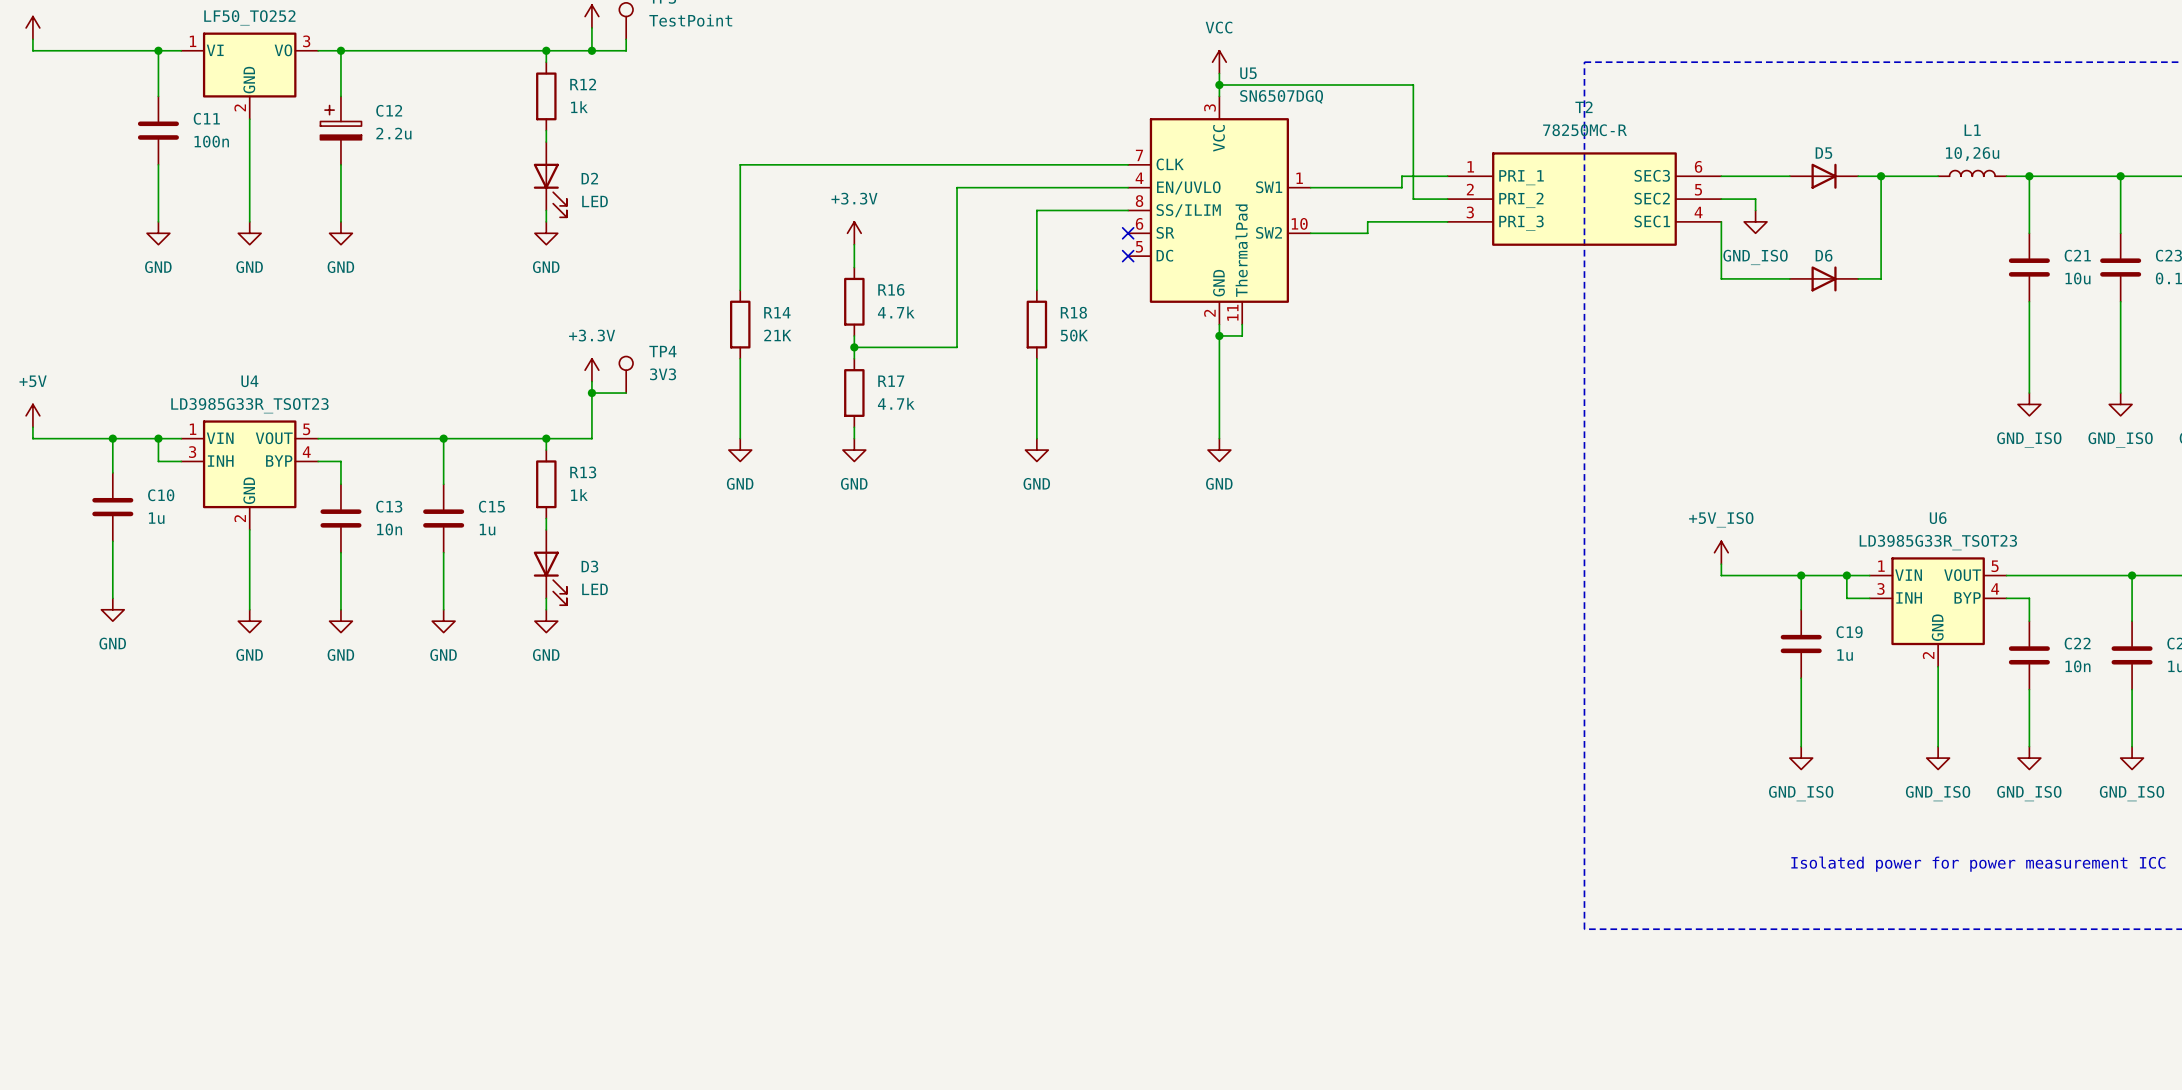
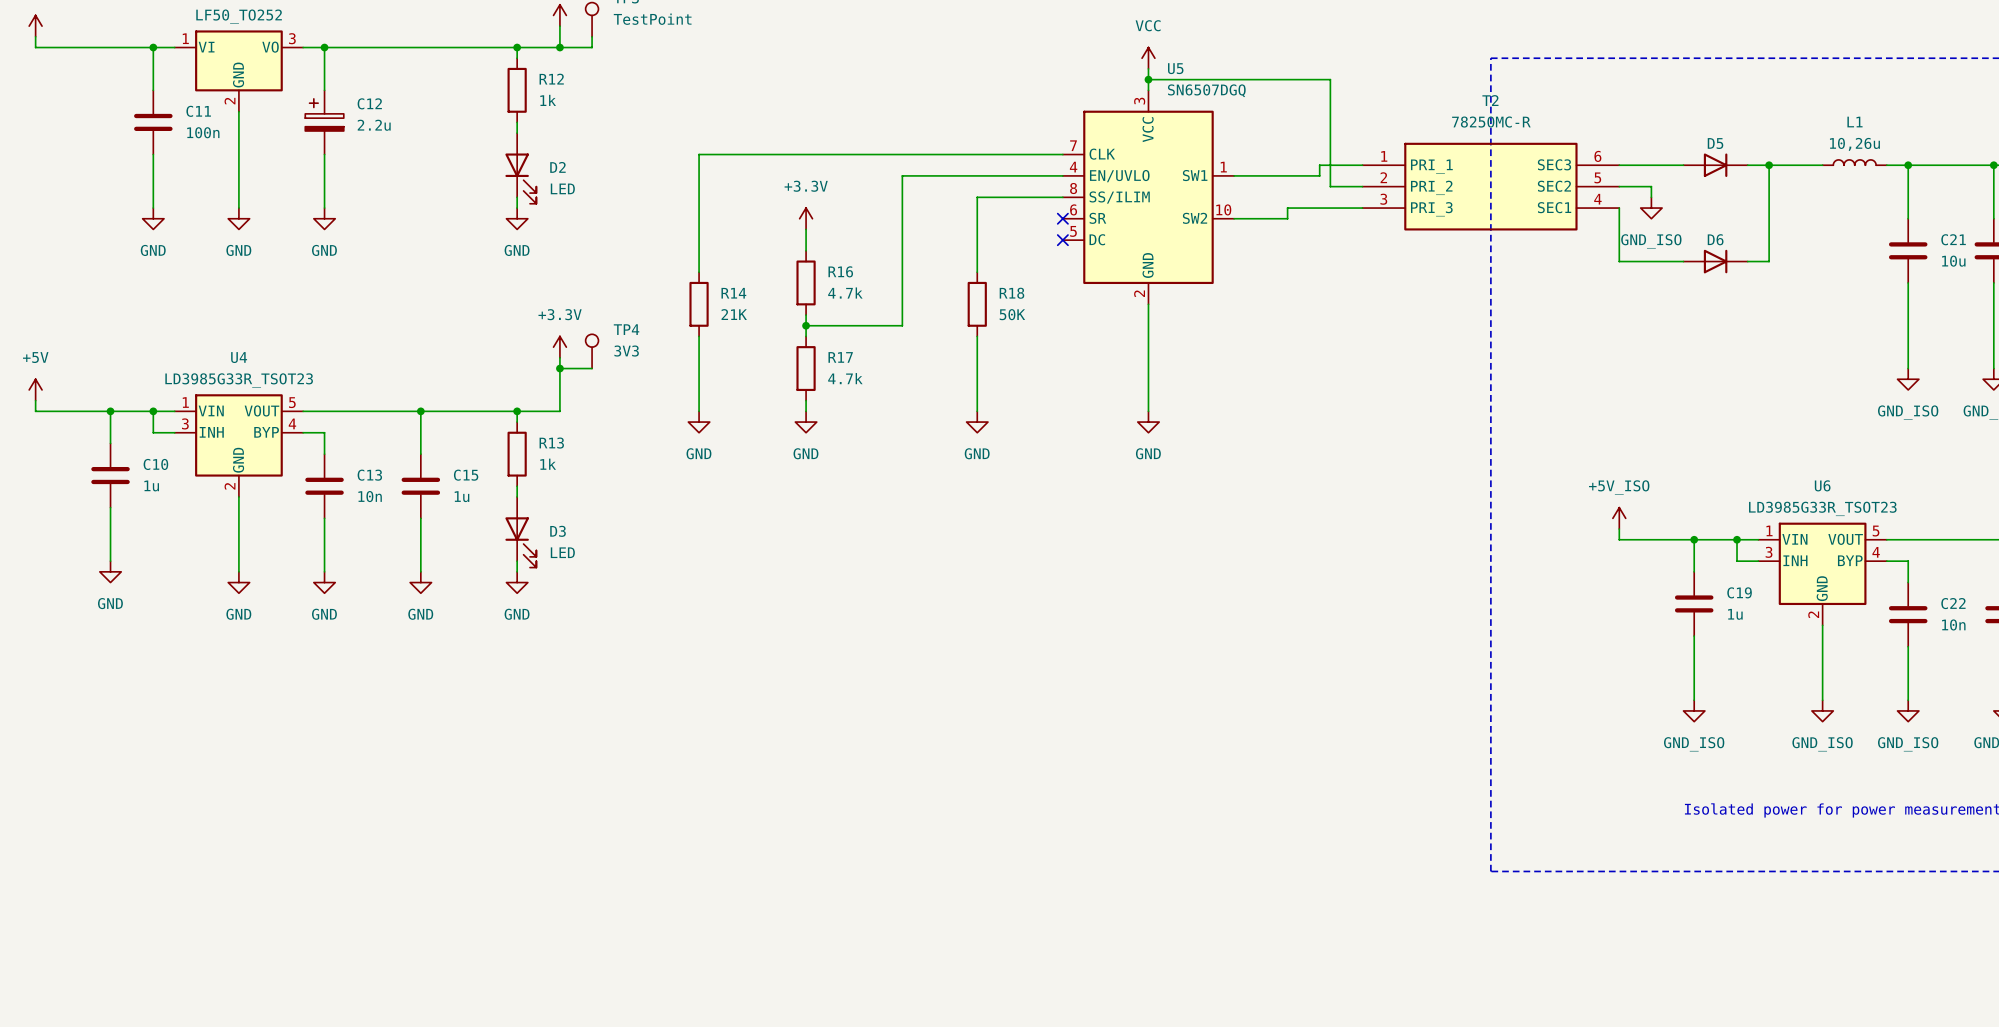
U5 symbol: [1128, 96, 1311, 325] -> [1062, 90, 1235, 305]
wire: (1242, 324) (1242, 335) (1219, 335) -> none
junction: (1219, 335) -> none

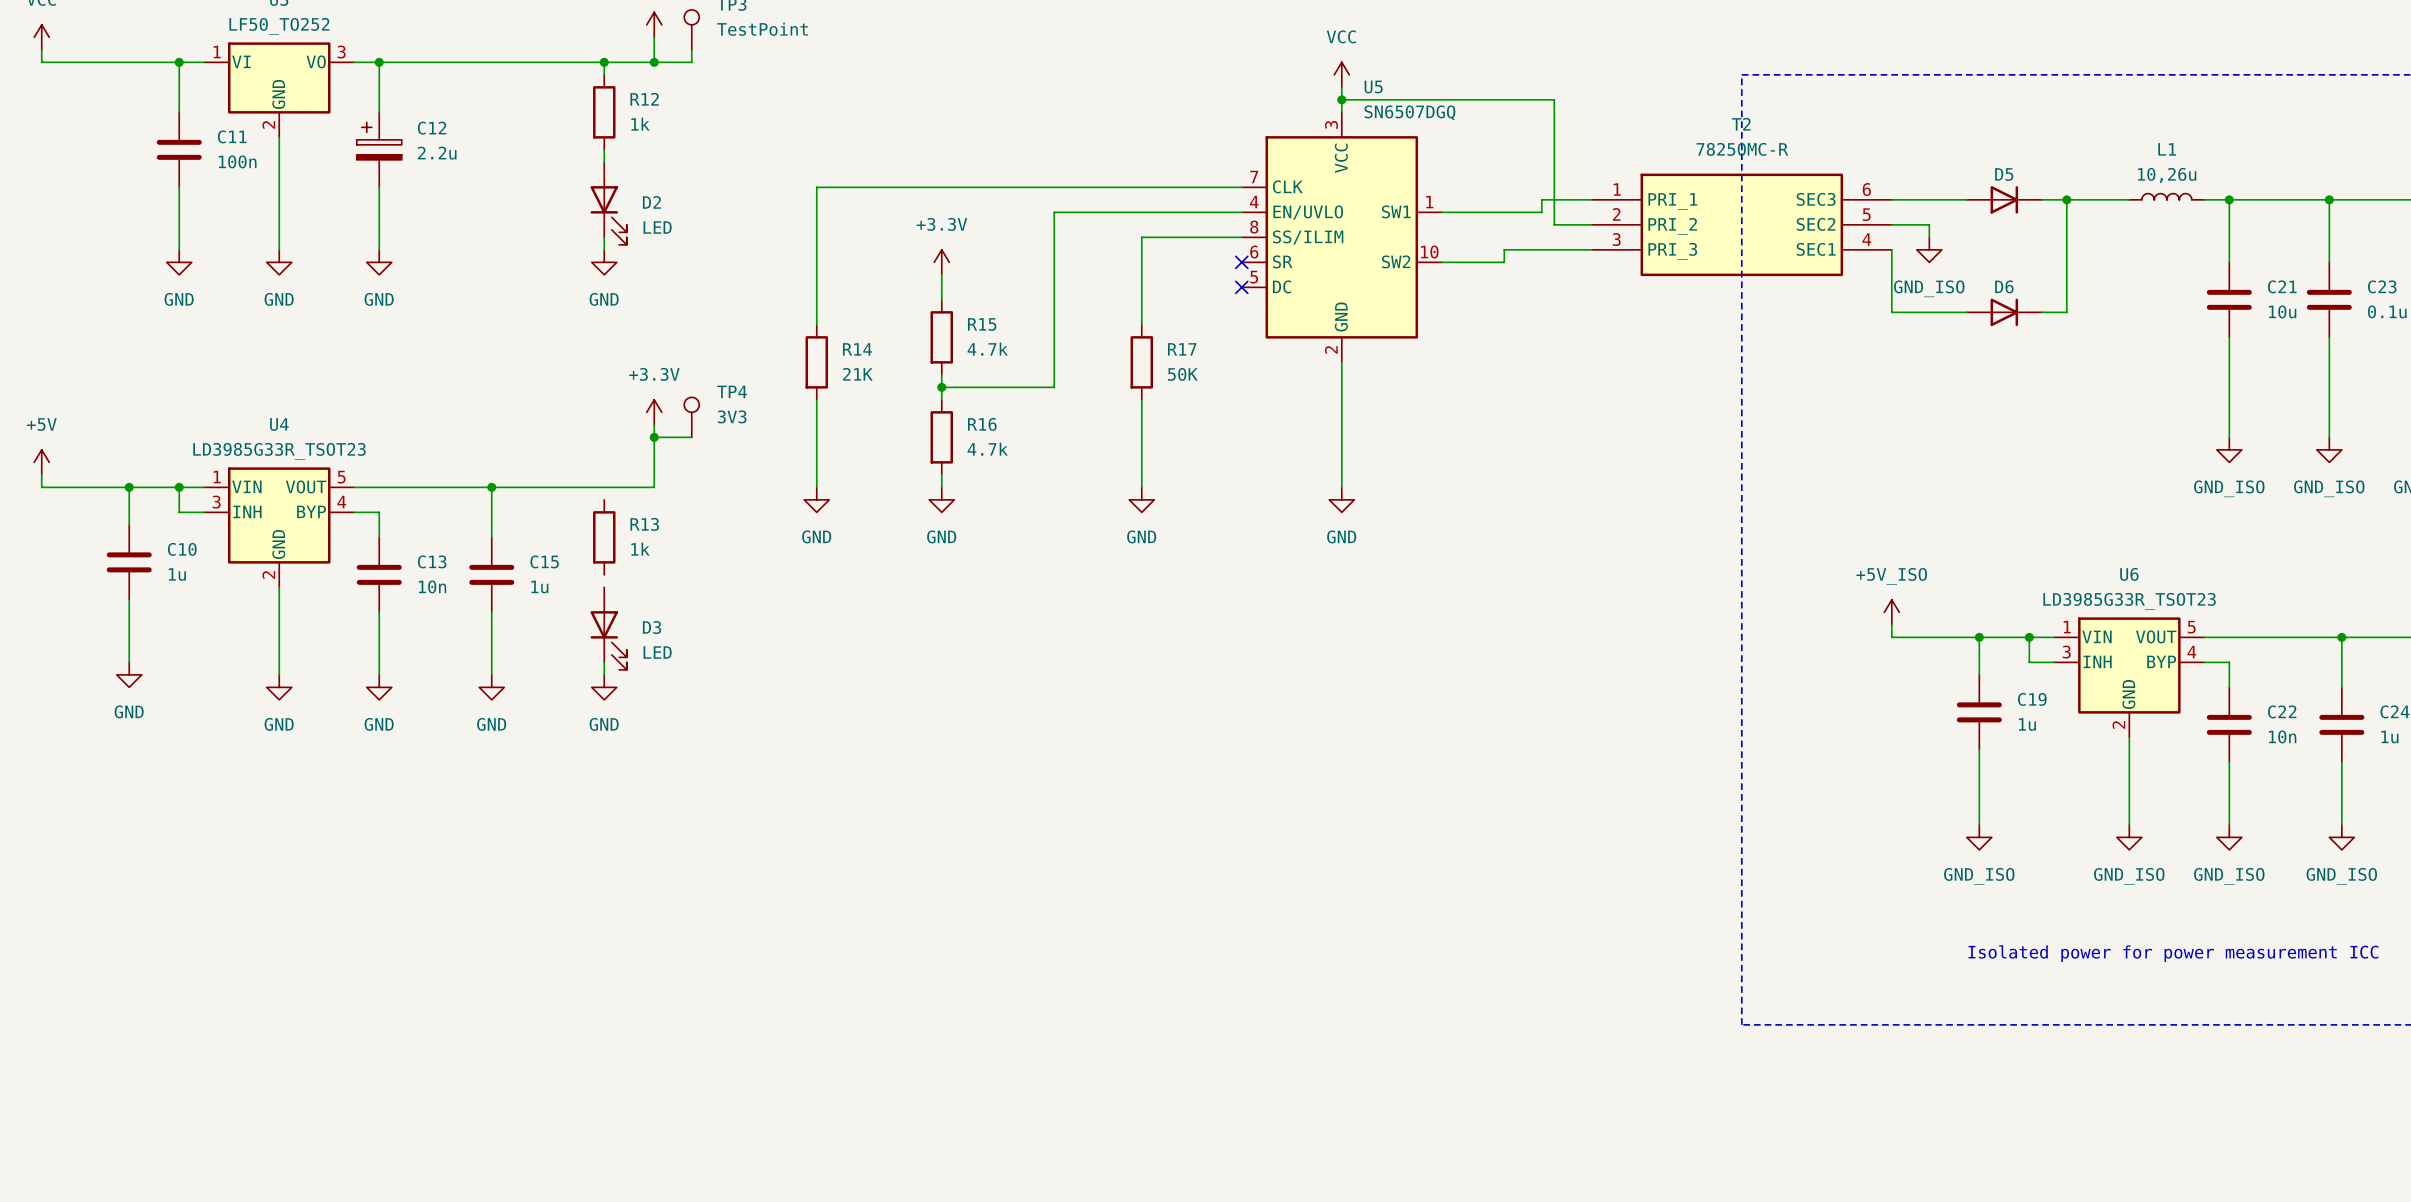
R16 name: R16 (840, 271) -> R15 (982, 324)
R18 name: R18 (1011, 293) -> R17 (1182, 349)
R17 name: R17 (840, 357) -> R16 (982, 424)
wire: (517, 411) (517, 422) -> none
junction: (517, 411) -> none
wire: (517, 486) (517, 496) -> none

